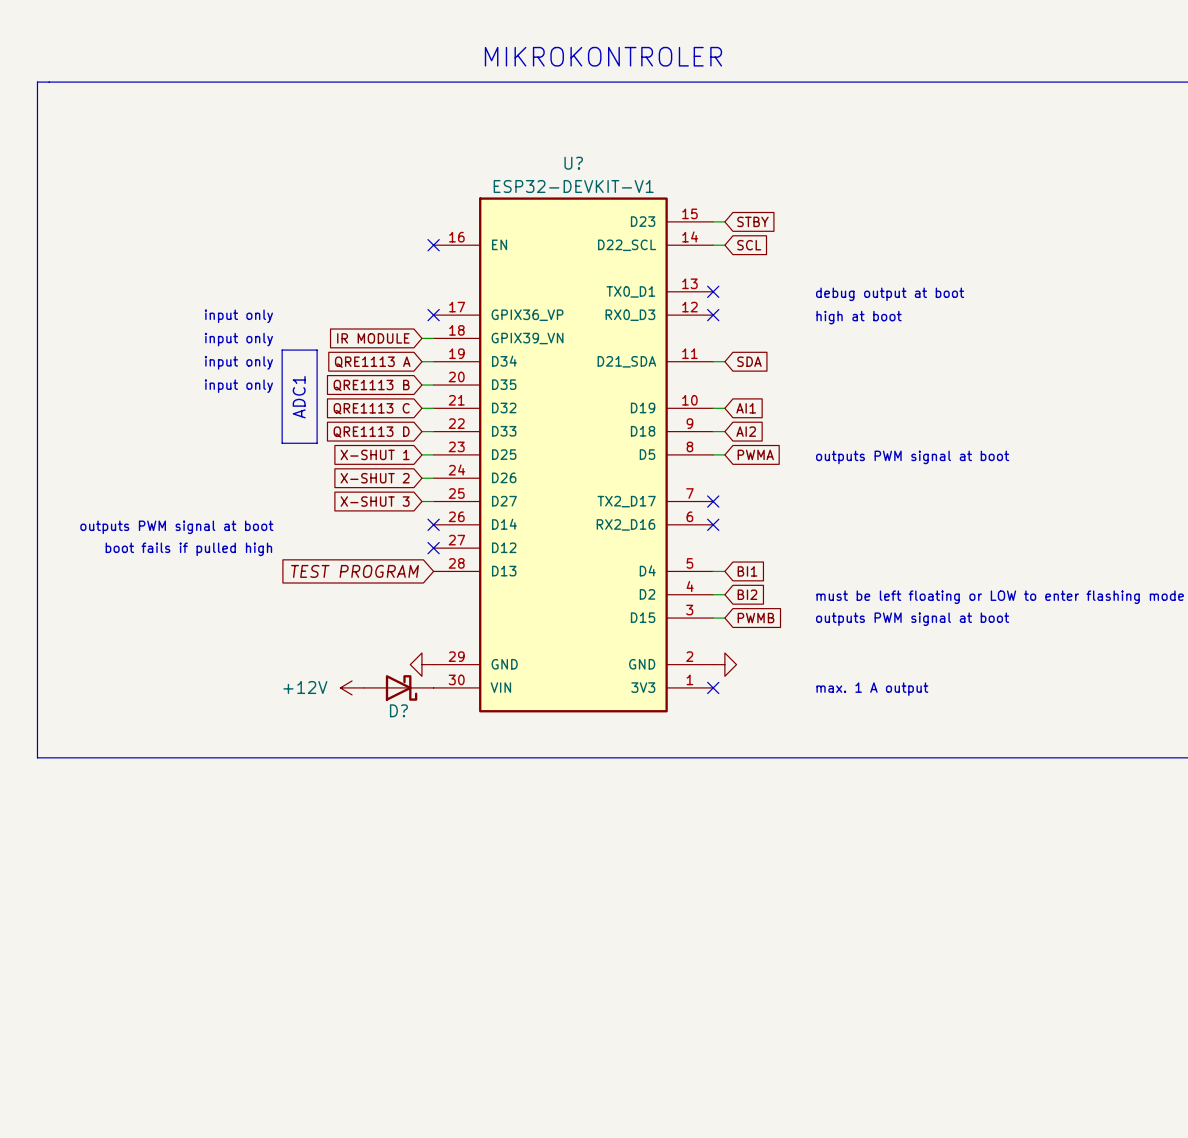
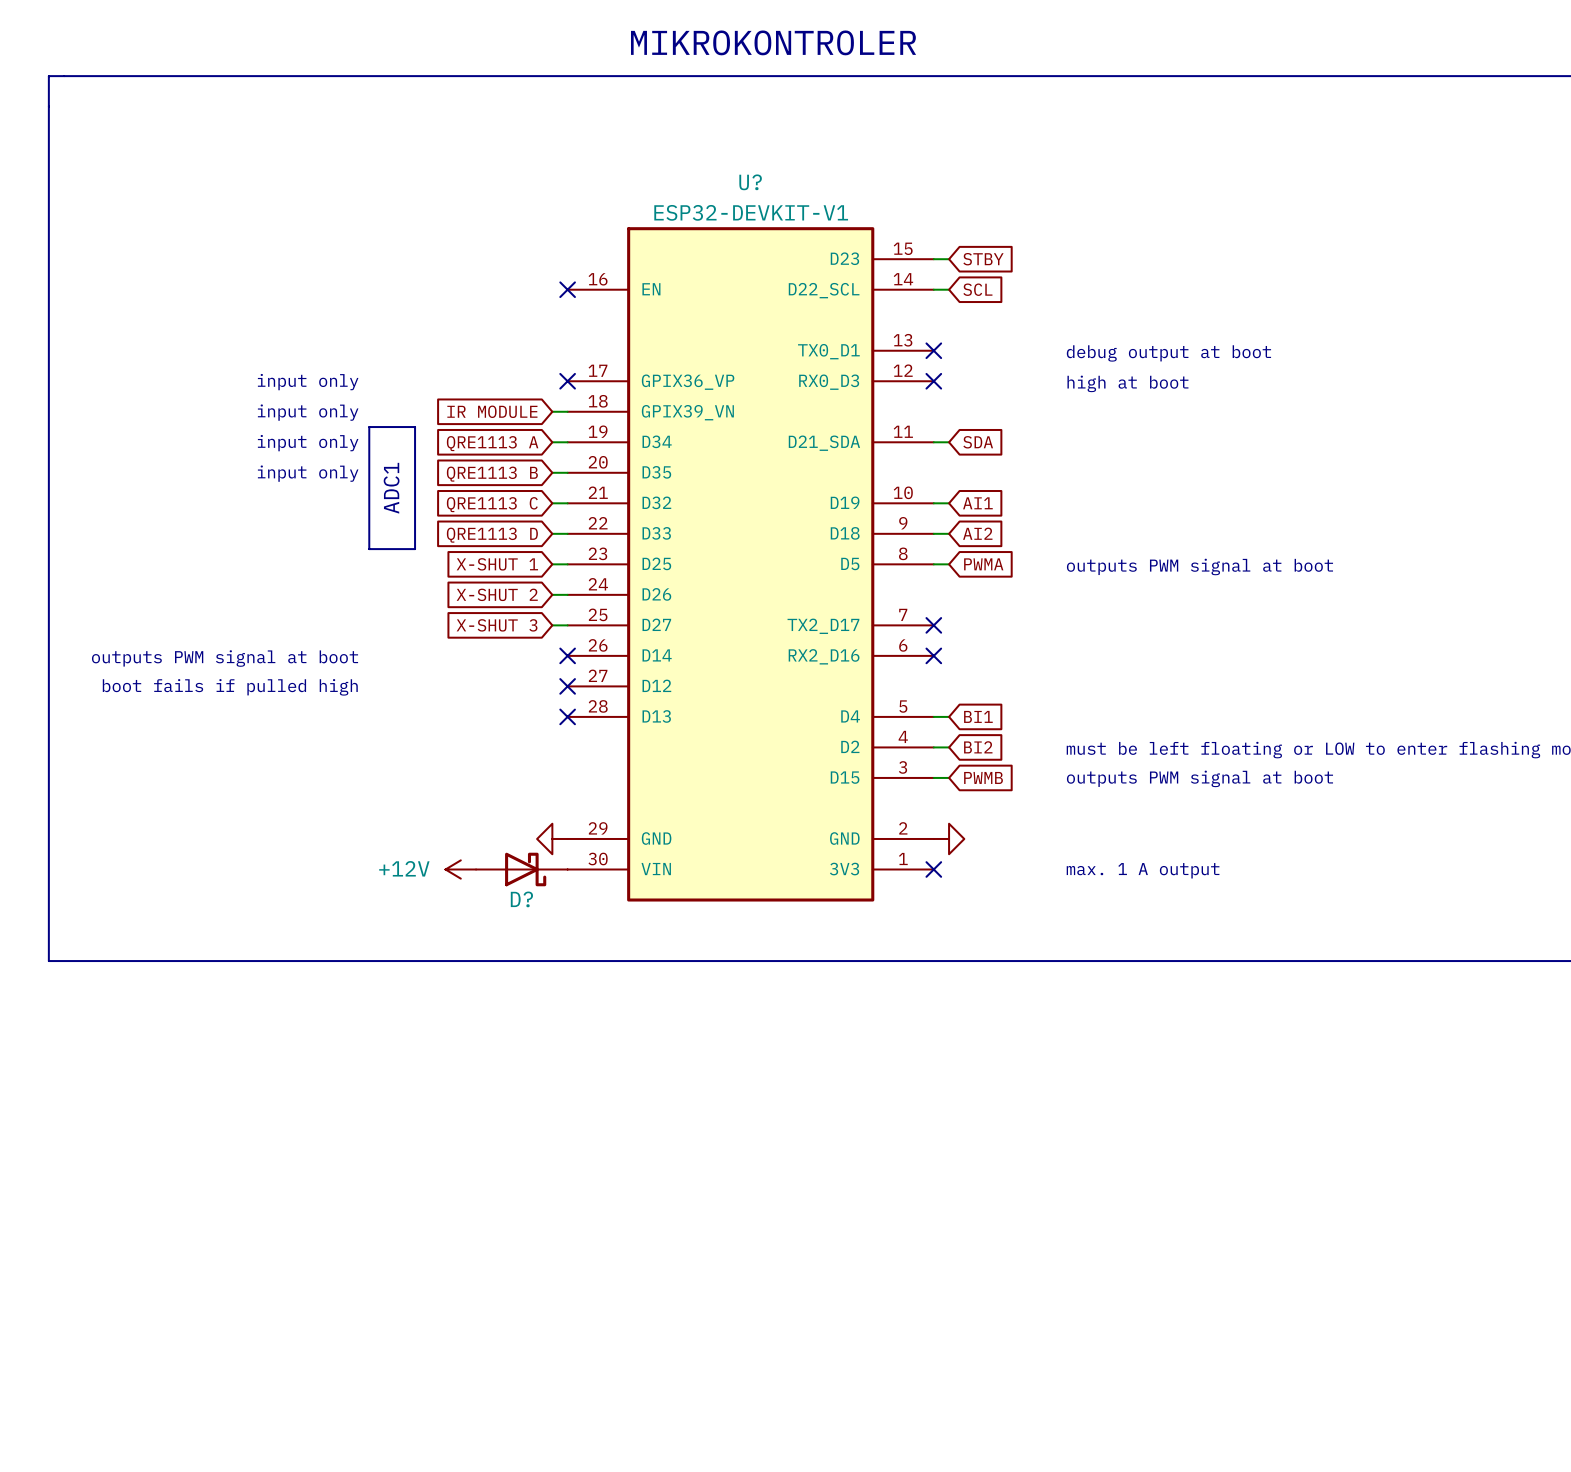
global label: TEST PROGRAM (355, 571) -> none
no-connect mark: none -> (567, 716)

